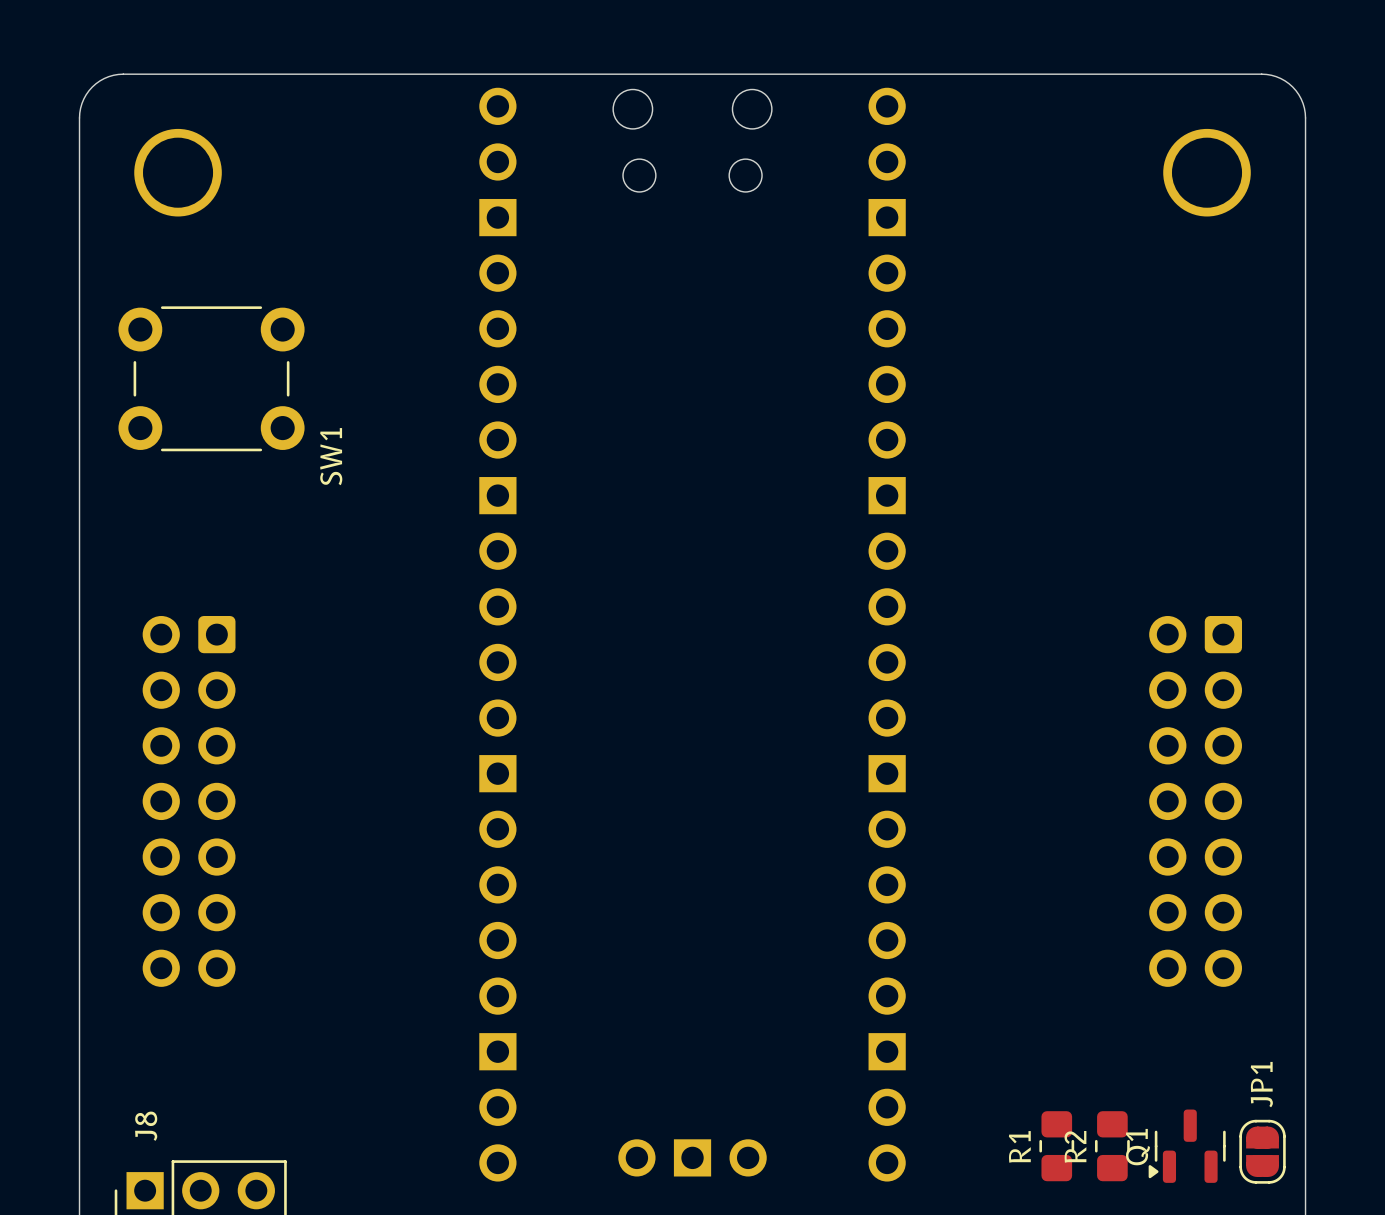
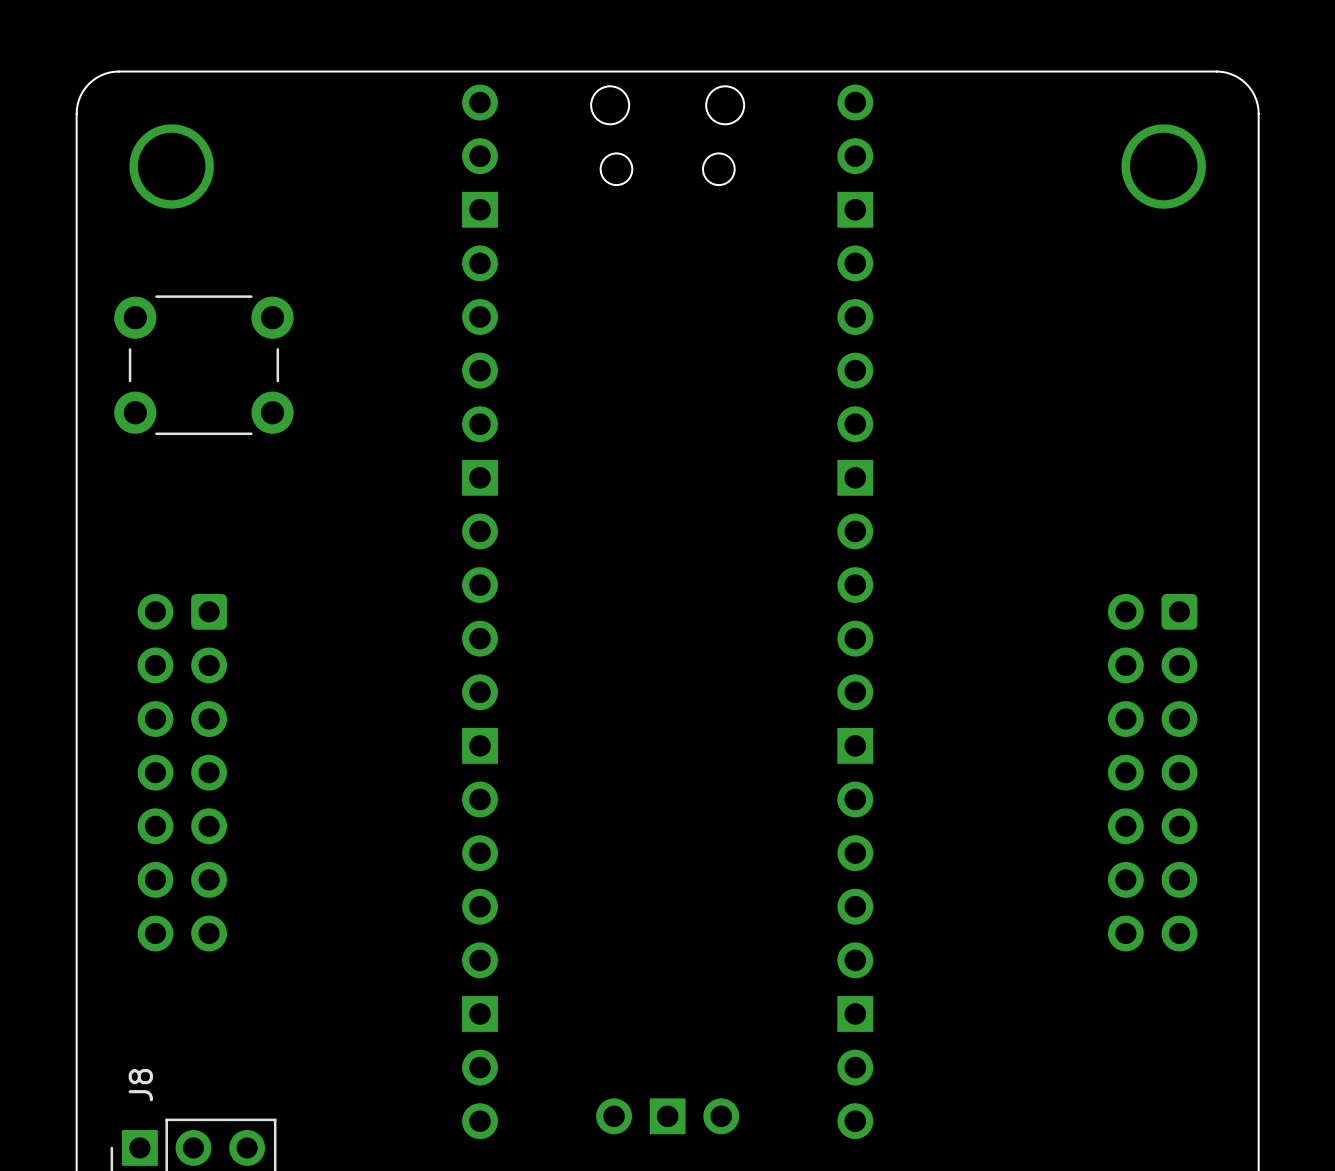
SW1 name: SW1 (331, 456) -> none
R1: (1056, 1146) -> none
R2: (1112, 1146) -> none
Q1: (1187, 1146) -> none
JP1: (1262, 1151) -> none

